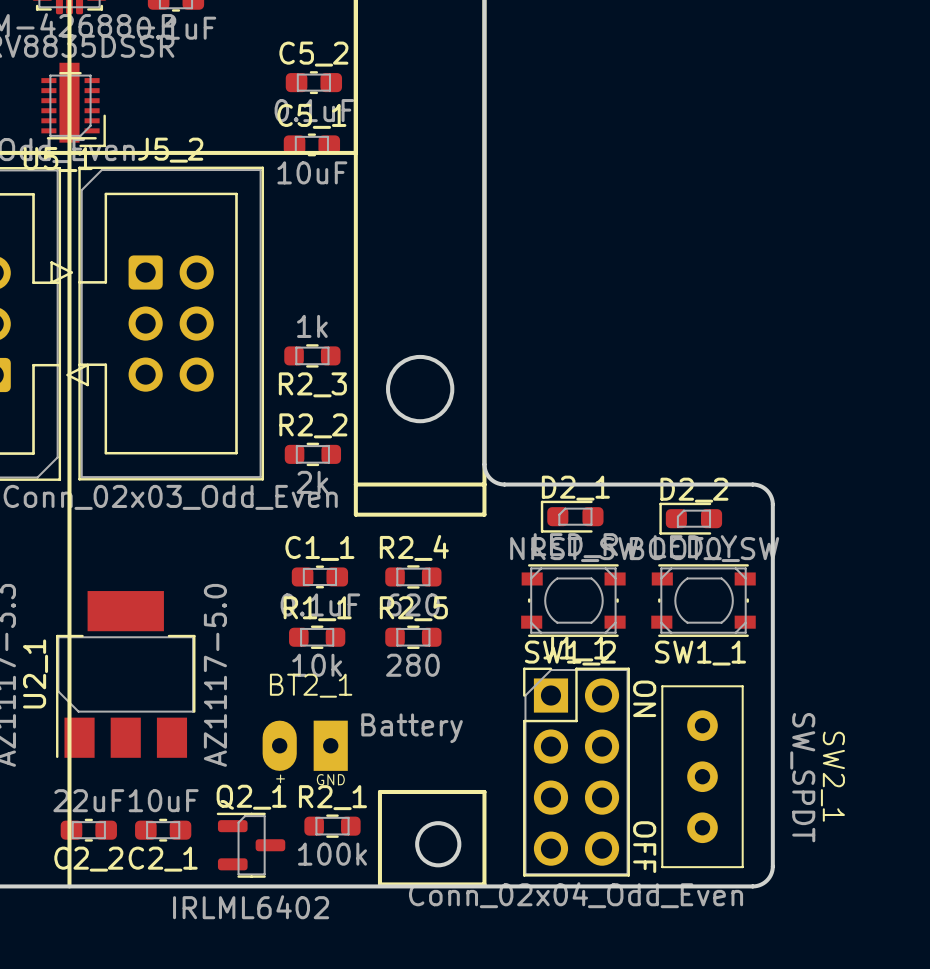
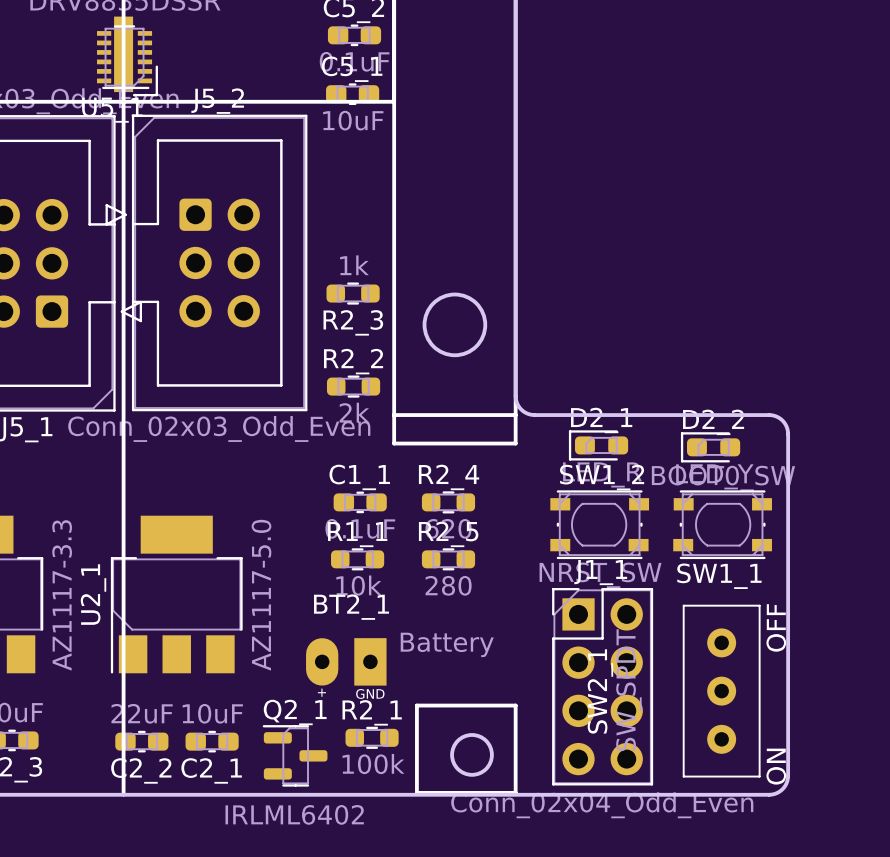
SW1_2 rotation: 0° (573, 600) -> 180° (599, 524)
SW2_1 rotation: 0° (702, 776) -> 180° (721, 691)

